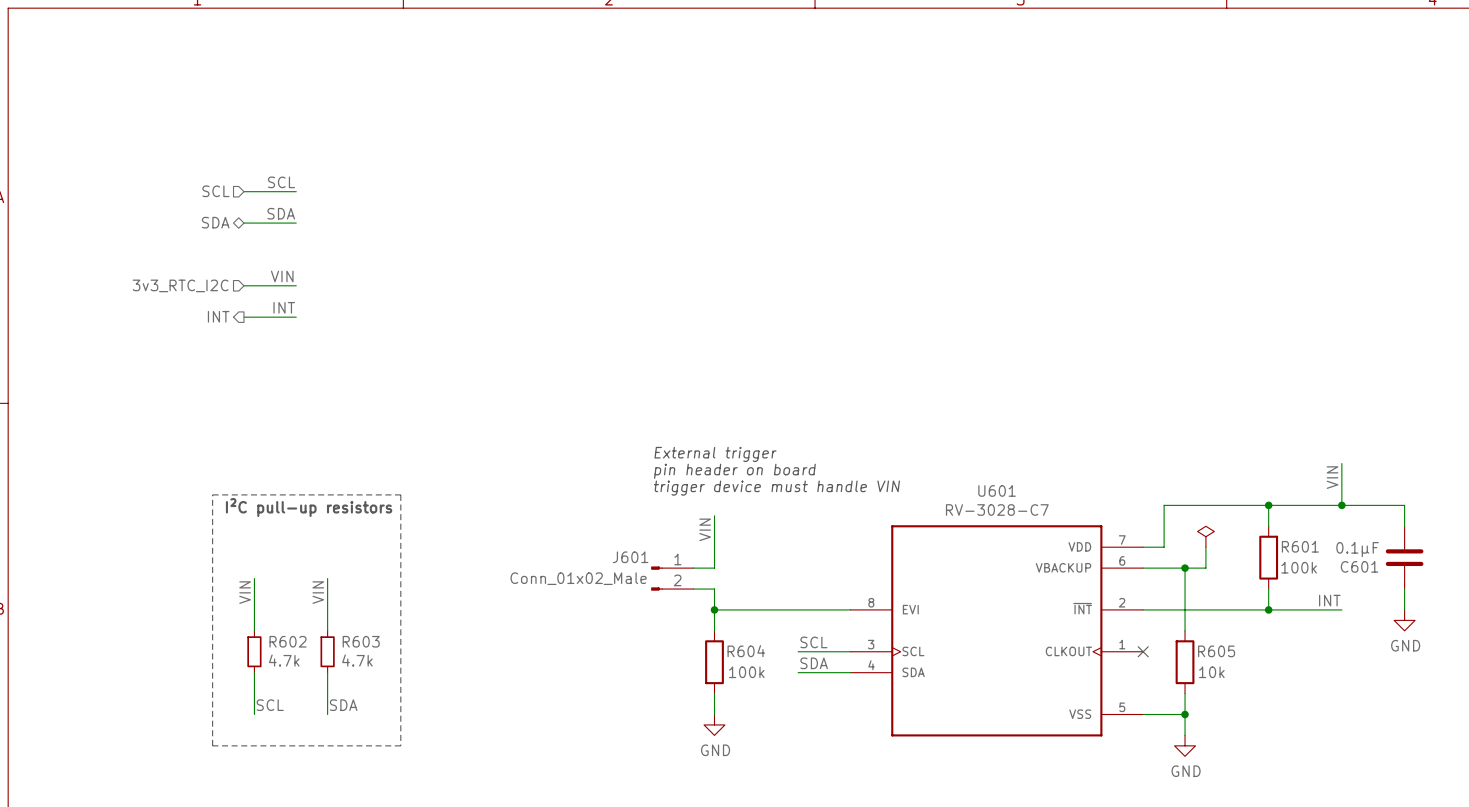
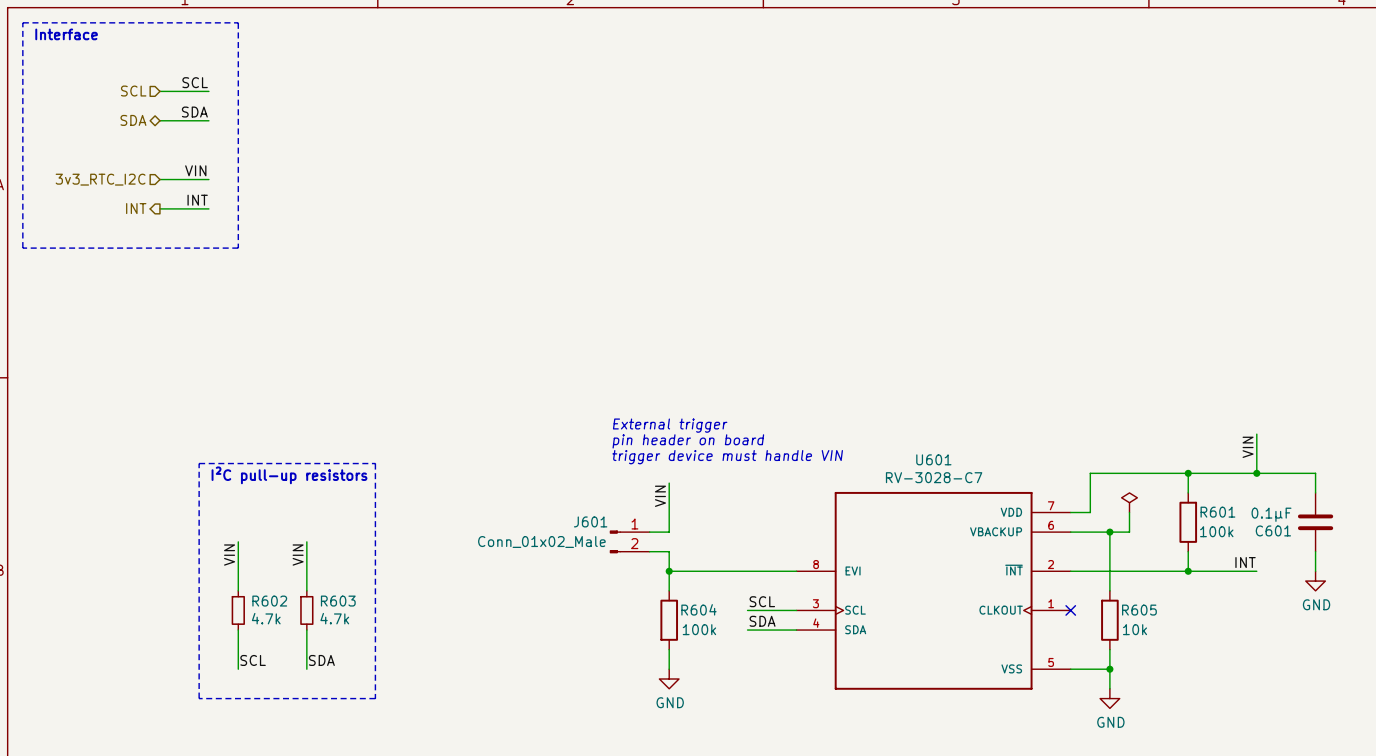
line: none -> (22, 22) (238, 22) (238, 248) (22, 248) (22, 22)
text: none -> Interface (66, 34)
label position: SCL (281, 182) -> SCL (195, 82)
hierarchical label position: SCL (215, 191) -> SCL (133, 91)
wire: (243, 191) (296, 191) -> (159, 91) (208, 91)
label position: SDA (281, 213) -> SDA (194, 112)
hierarchical label position: SDA (215, 222) -> SDA (133, 120)
wire: (243, 223) (296, 223) -> (159, 120) (208, 120)
label position: VIN (282, 276) -> VIN (195, 170)
hierarchical label position: 3v3_RTC_I2C (180, 285) -> 3v3_RTC_I2C (100, 179)
wire: (243, 285) (296, 285) -> (159, 179) (208, 179)
label position: INT (284, 307) -> INT (197, 200)
hierarchical label position: INT (218, 316) -> INT (136, 208)
wire: (243, 317) (296, 317) -> (159, 208) (208, 208)

